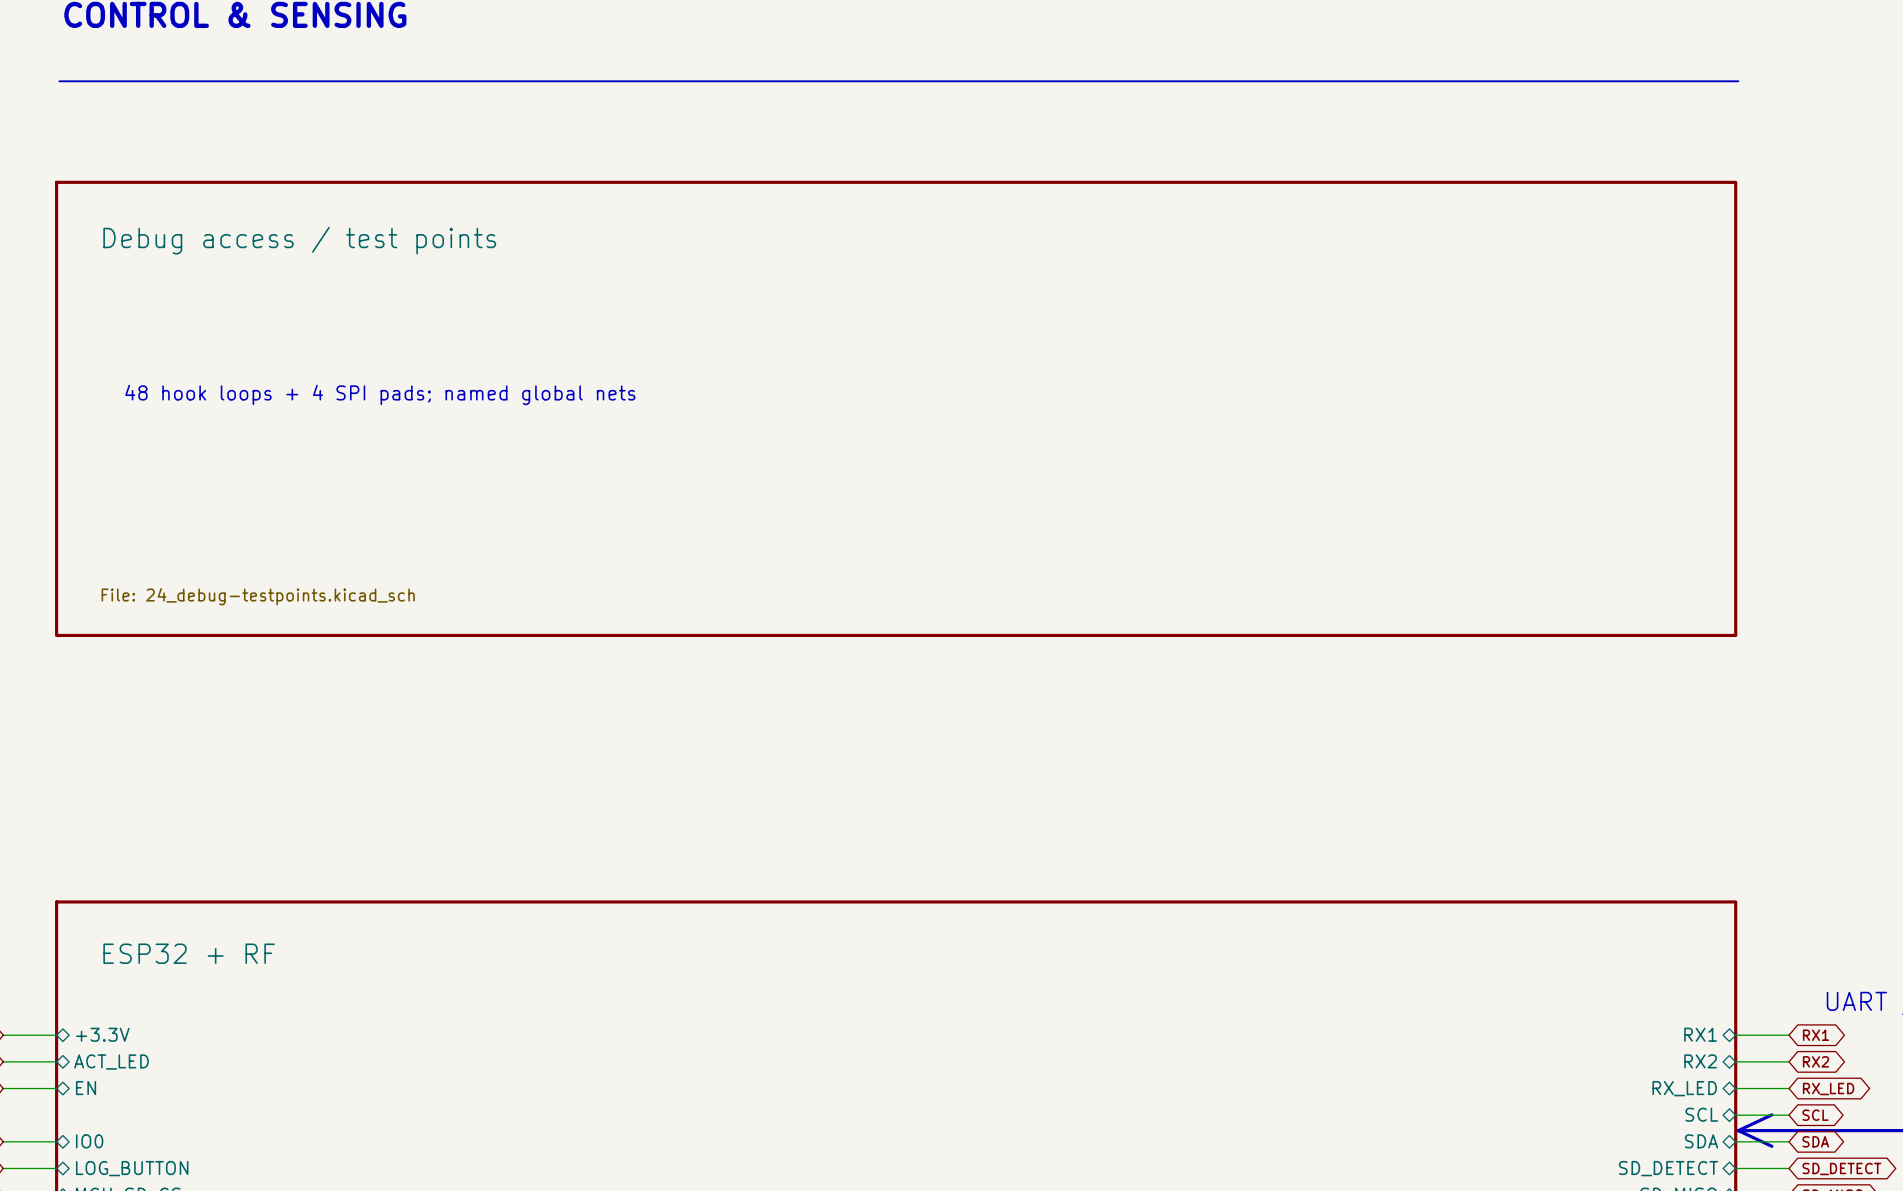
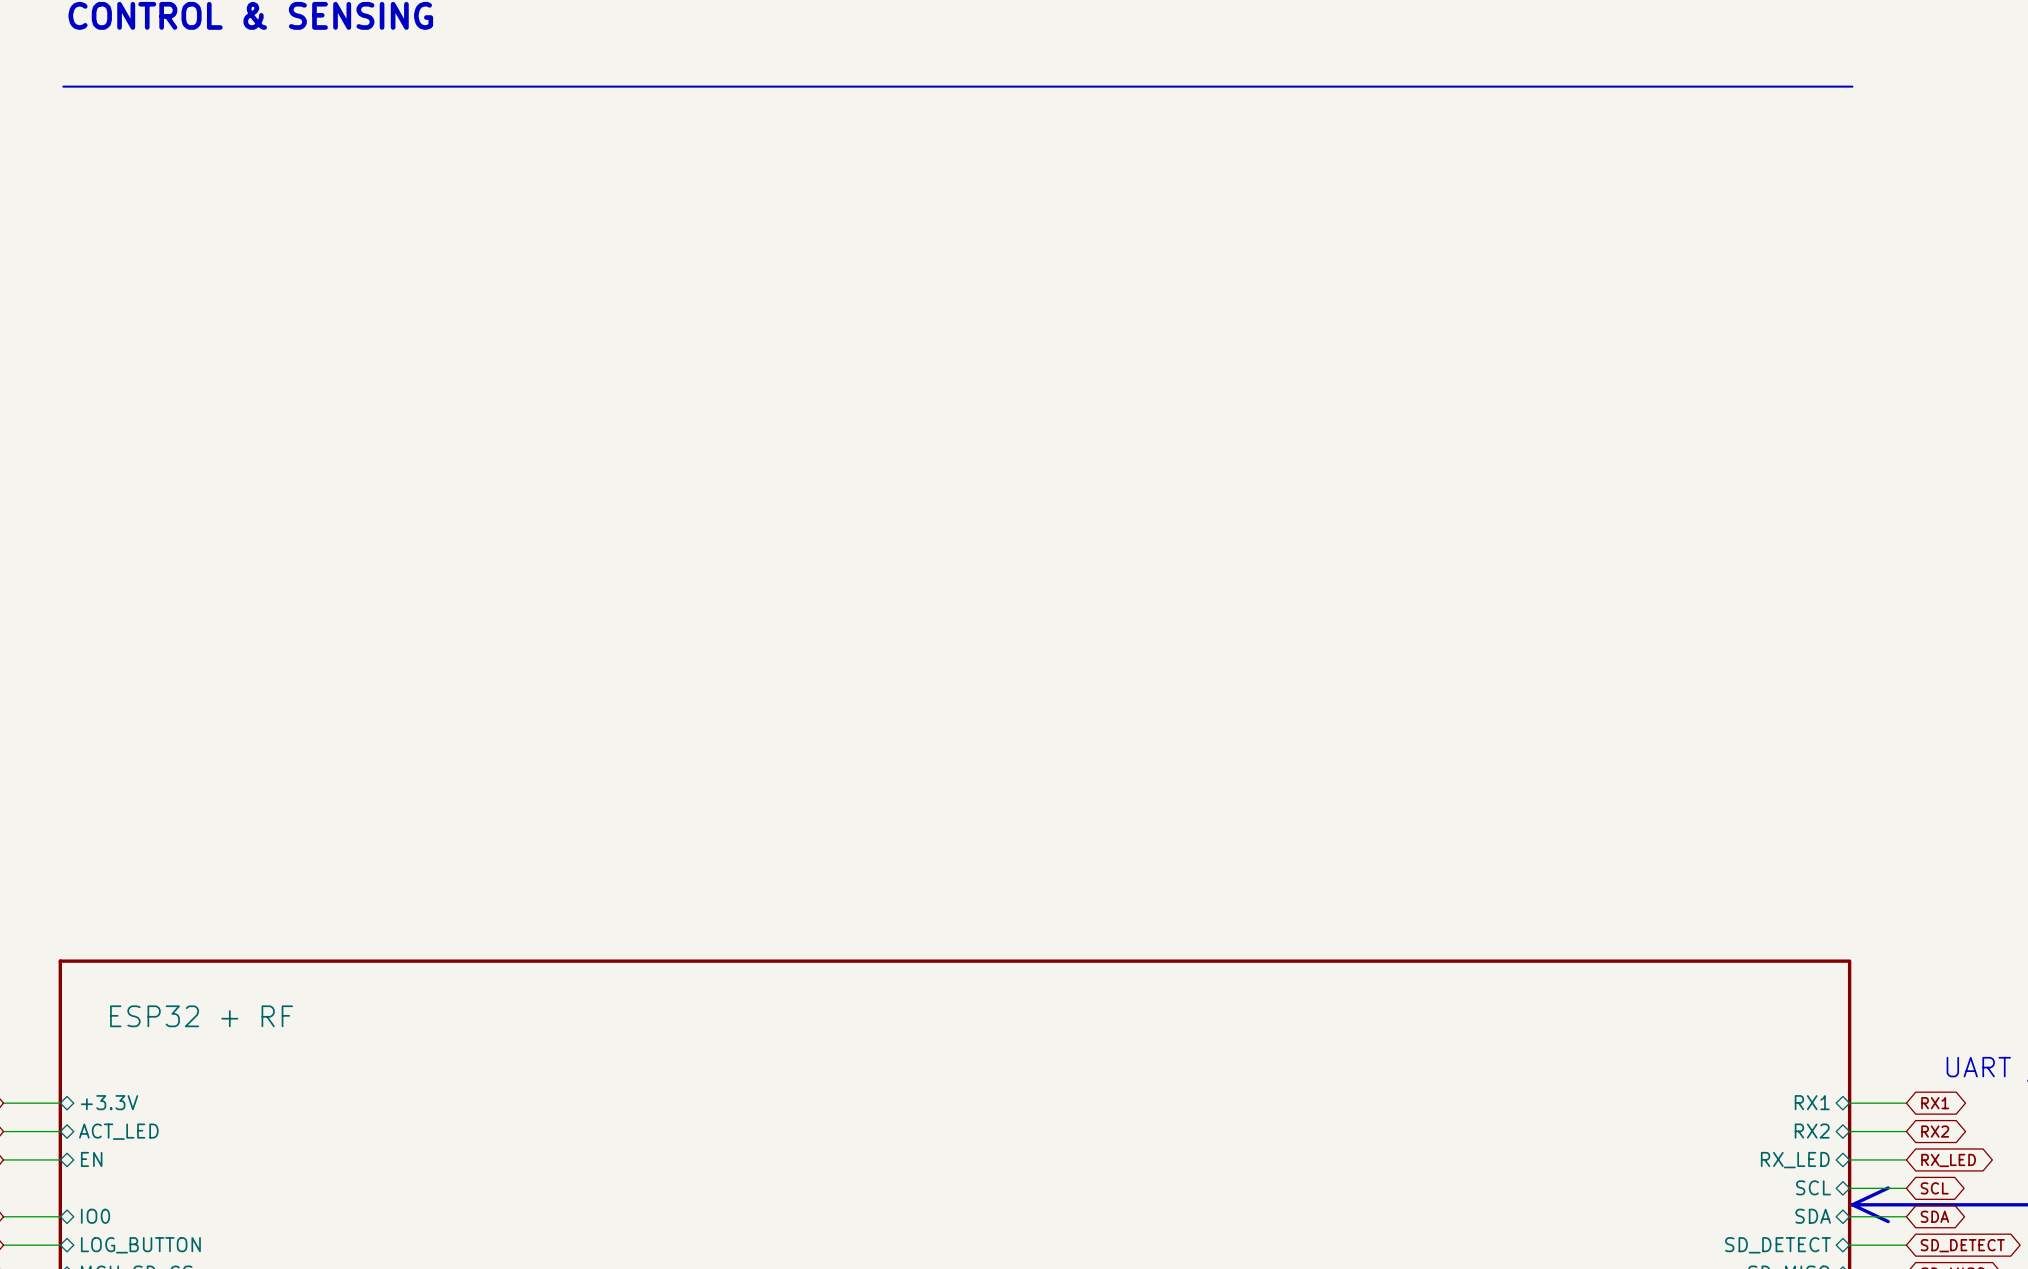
text: 48 hook loops + 4 SPI pads; named global nets (380, 394) -> none
sheet Debug access / test points: File: 24_debug-testpoints.kicad_sch (896, 408) -> none

